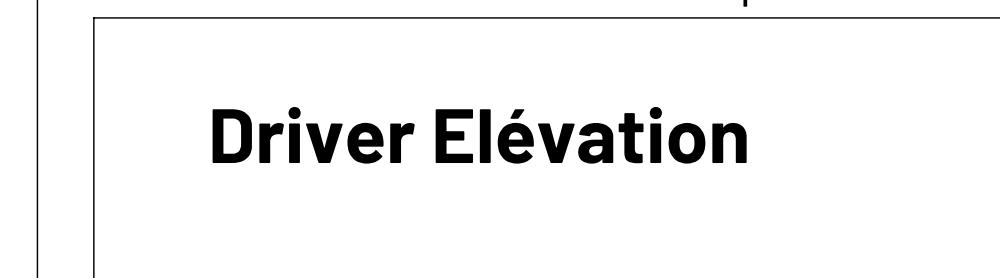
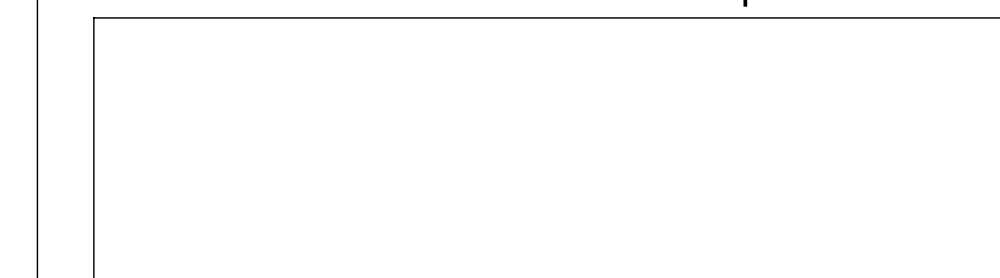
text: Driver Elévation (479, 135) -> none

